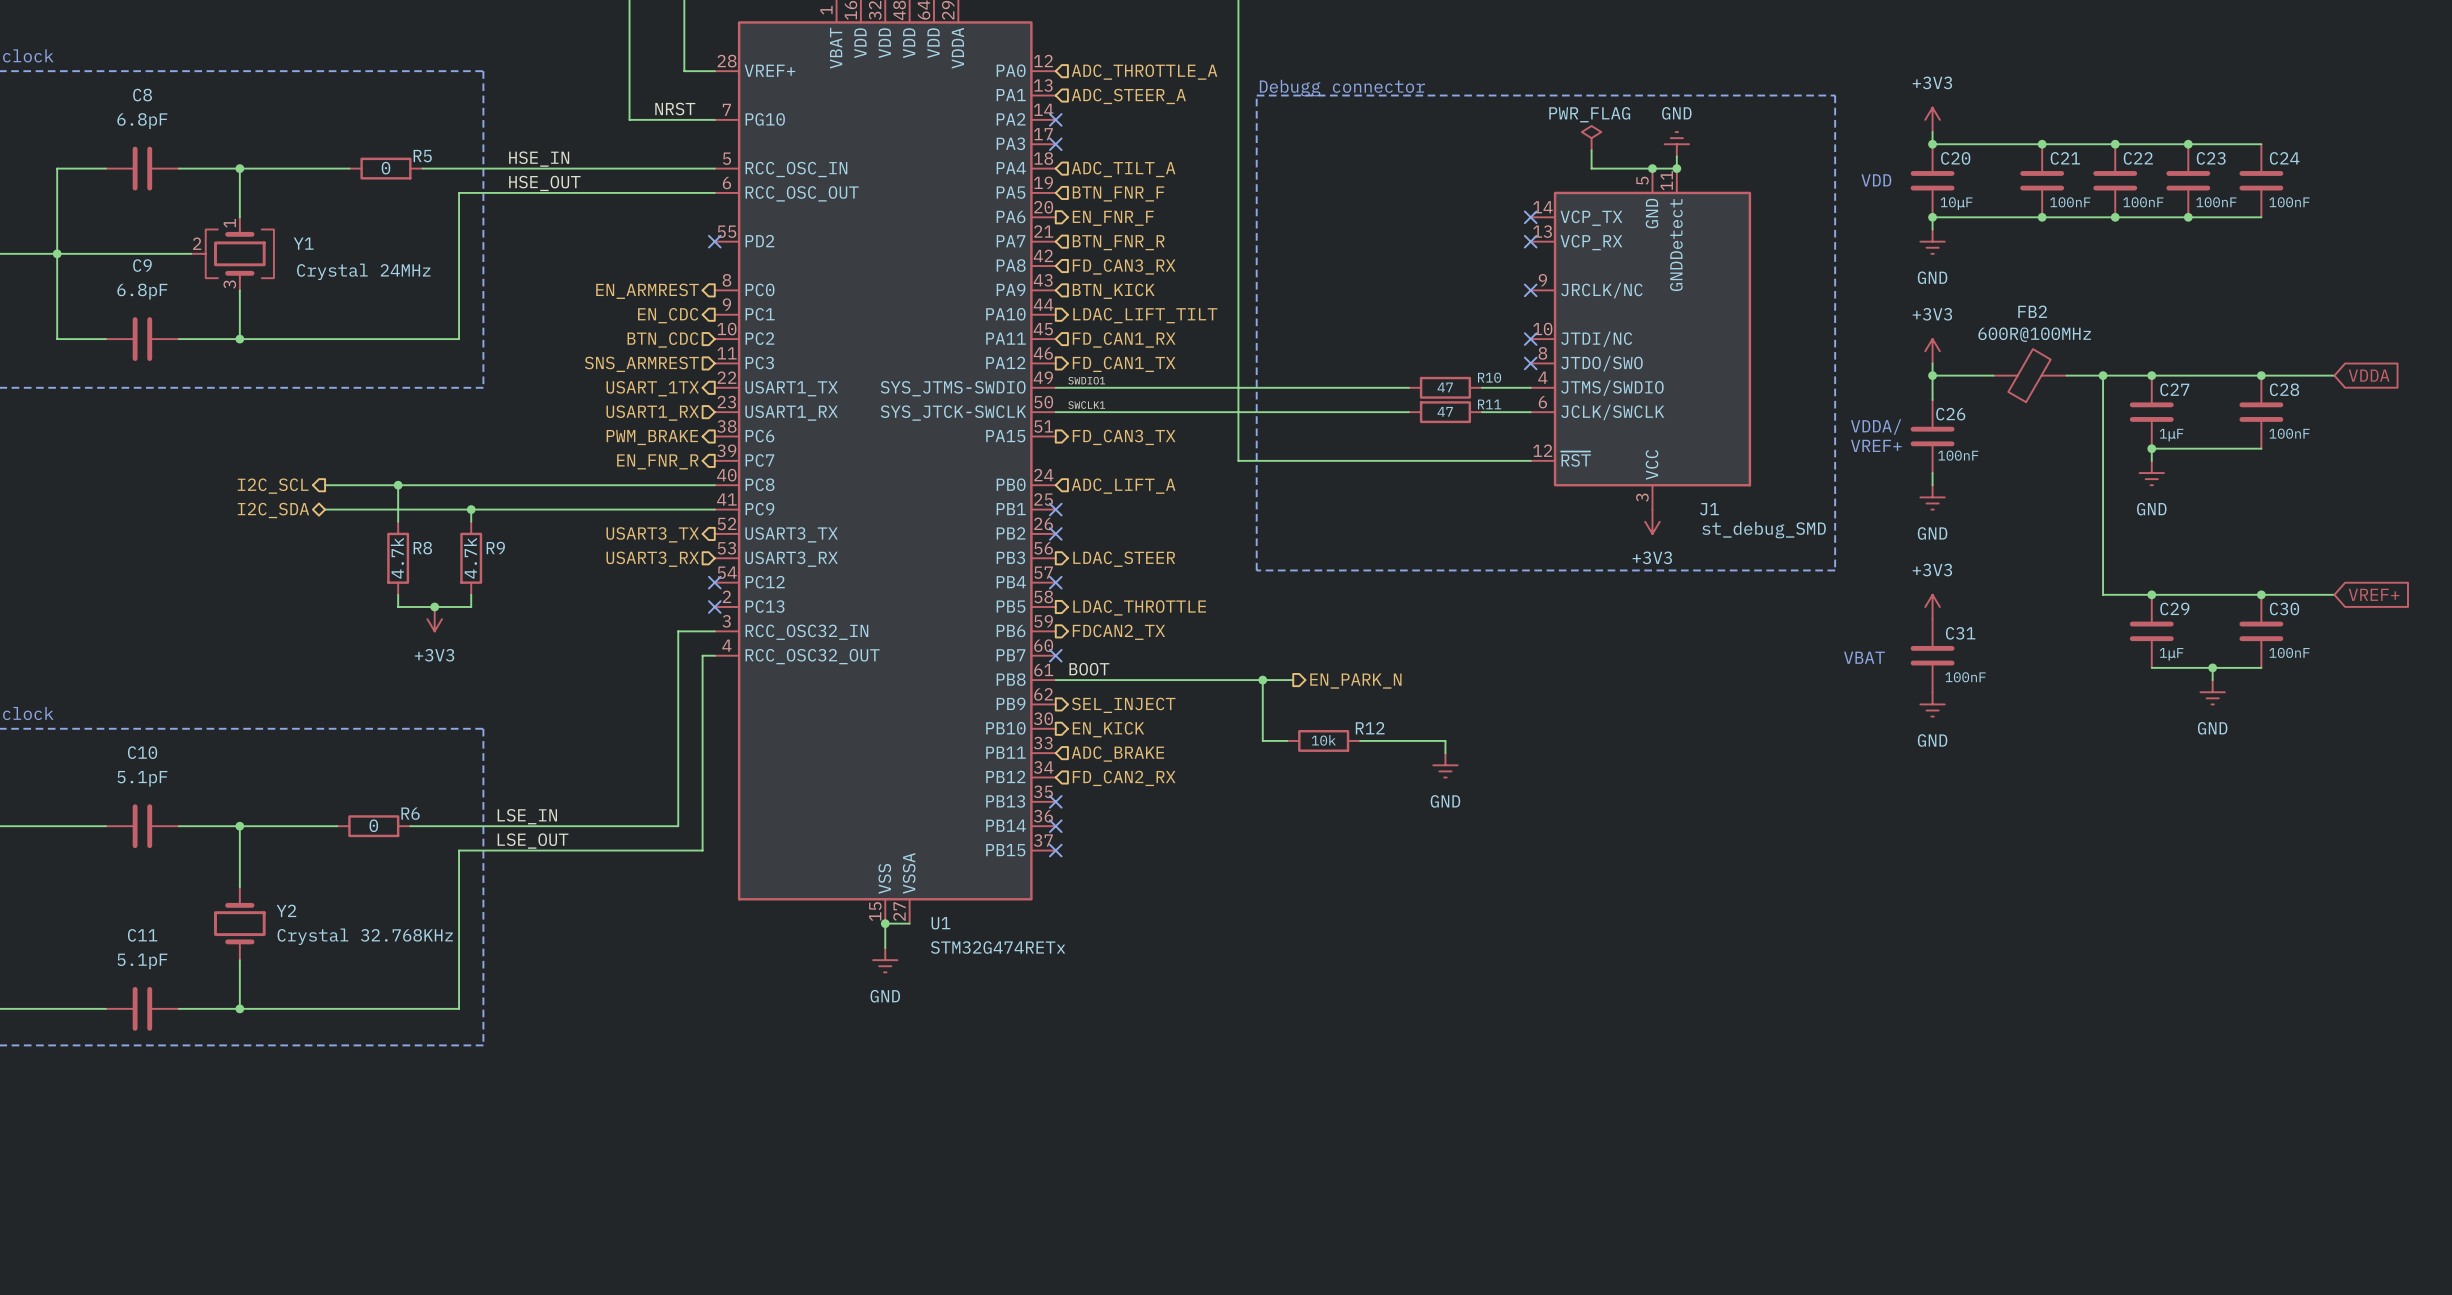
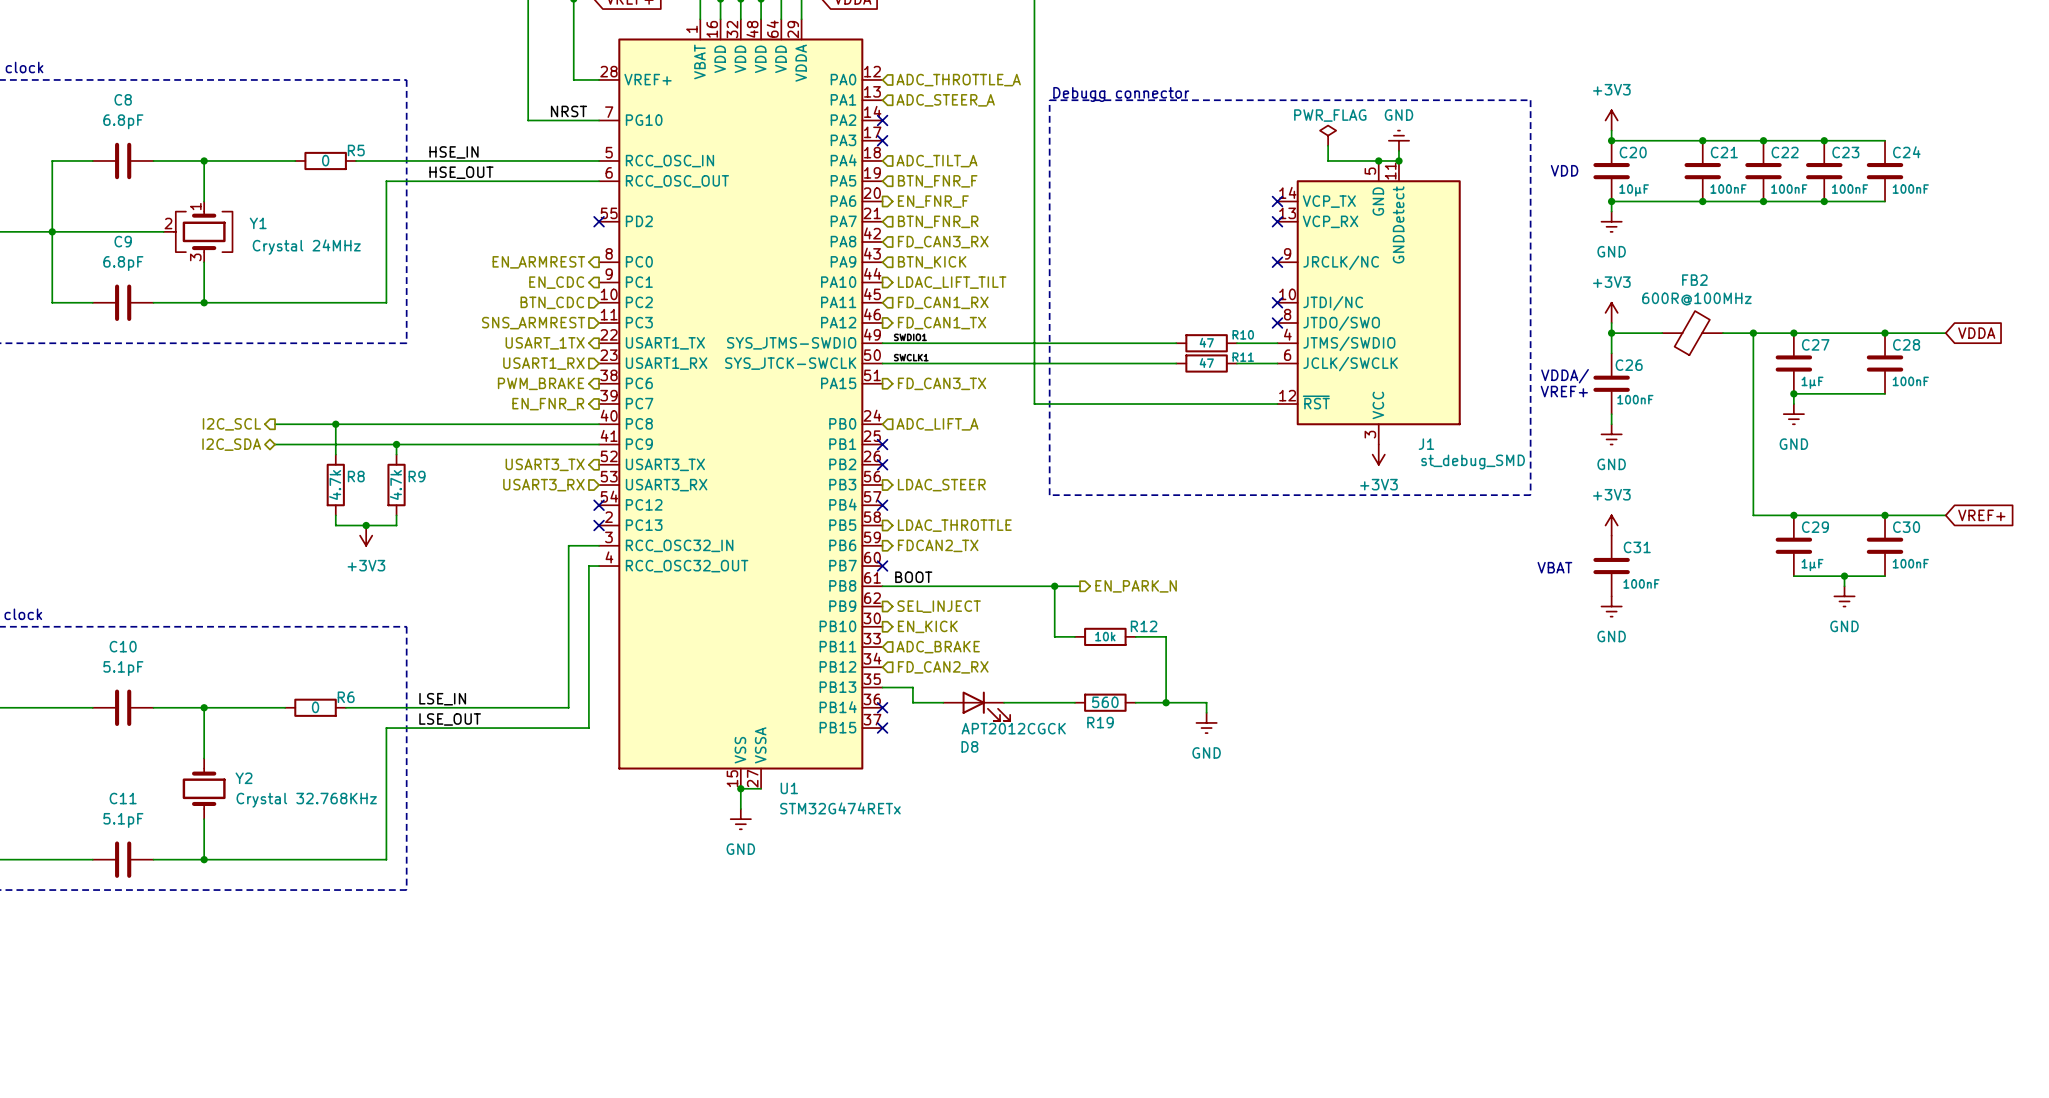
wire: (1396, 740) (1445, 740) (1445, 753) -> (1166, 636) (1166, 702)
power symbol position: GND (1445, 765) -> GND (1206, 722)
wire: none -> (882, 687) (912, 687) (912, 702) (943, 702)
no-connect mark: (1055, 801) -> none
wire: none -> (1004, 702) (1074, 702)
R19: none -> 560 (1105, 702)
wire: none -> (1135, 702) (1206, 702) (1206, 712)
junction: none -> (1166, 702)
D8: none -> APT2012CGCK (976, 706)

